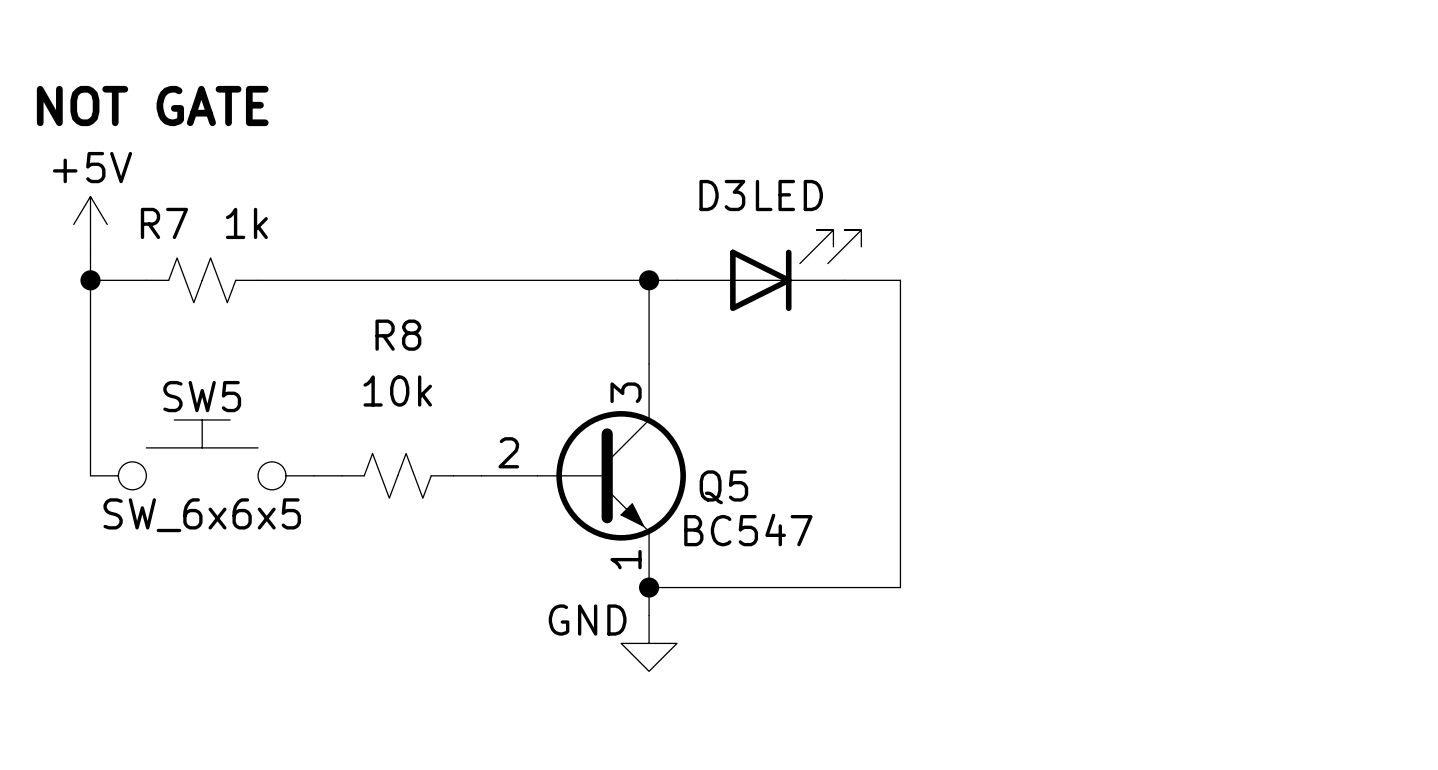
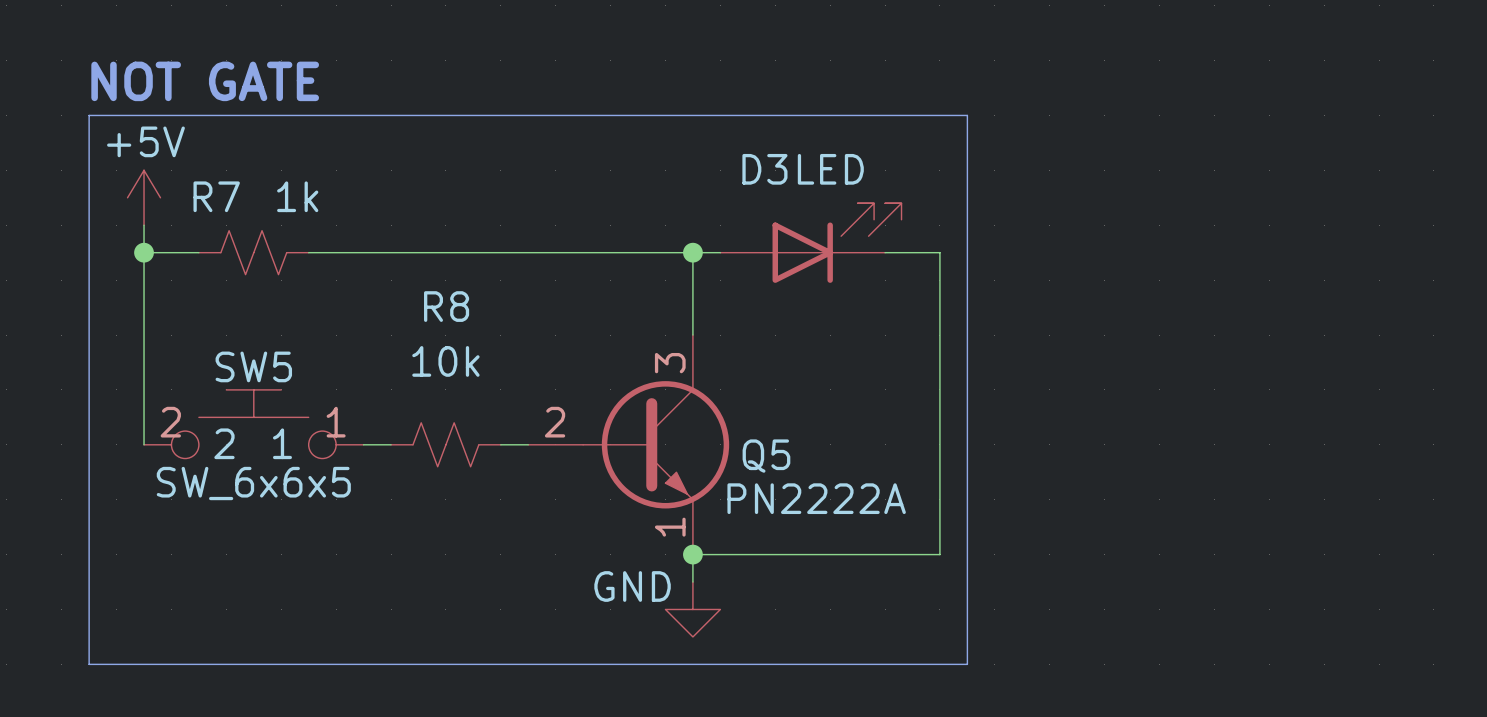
line: none -> (89, 115) (967, 115) (967, 664) (89, 664) (89, 115)
SW5 pin number: none -> 2 (170, 422)
SW5 pin number: none -> 1 (336, 422)
SW5 pin name: none -> 2 (224, 443)
SW5 pin name: none -> 1 (282, 443)
Q5 value: BC547 (748, 529) -> PN2222A (816, 498)

